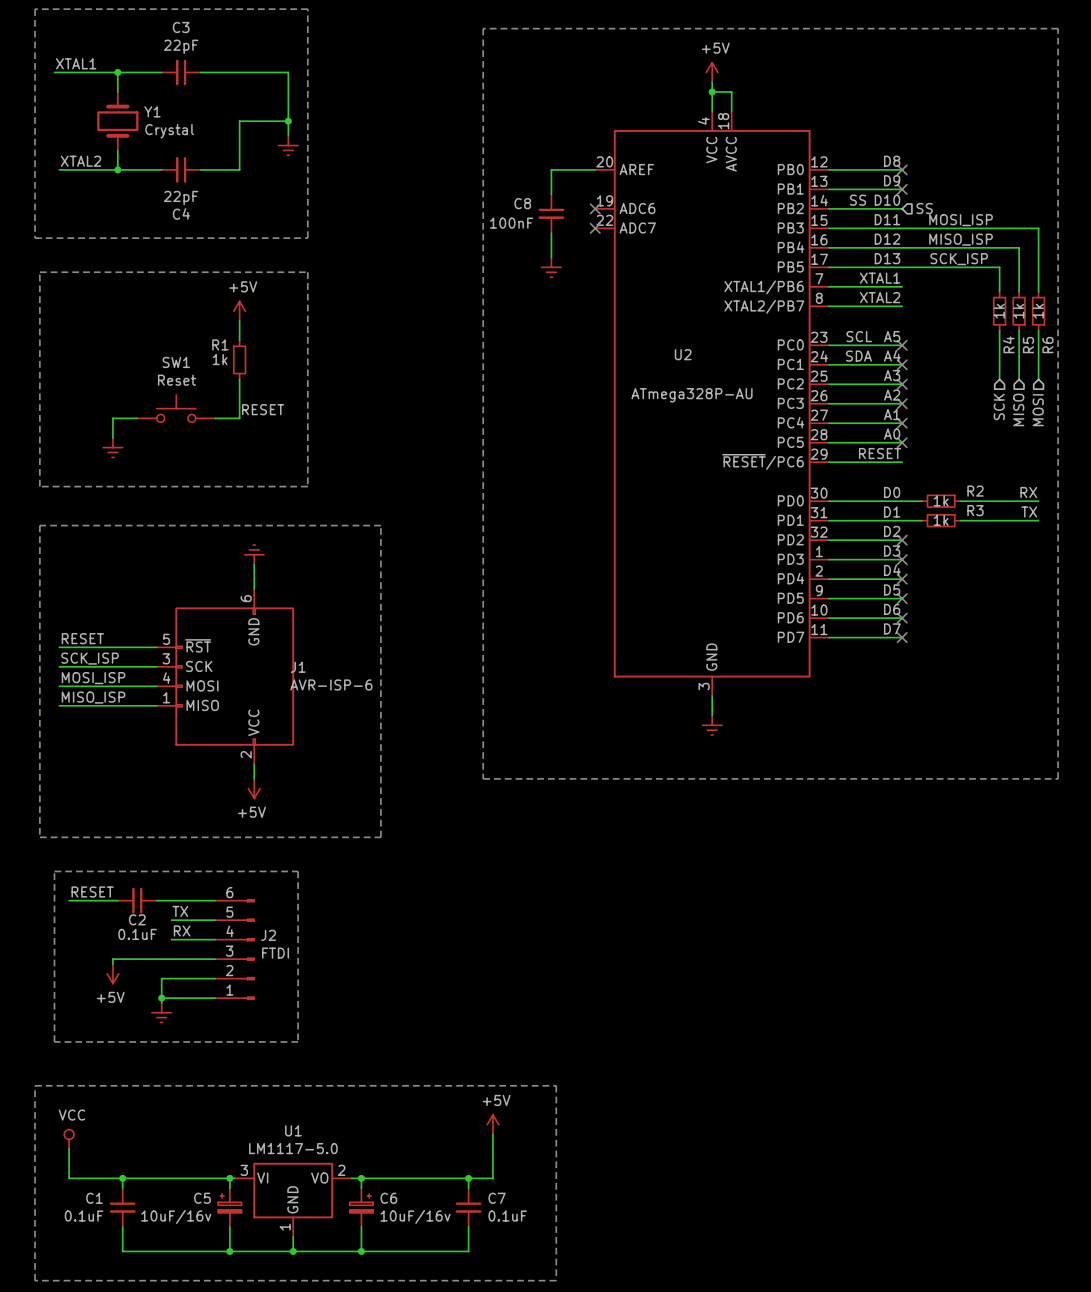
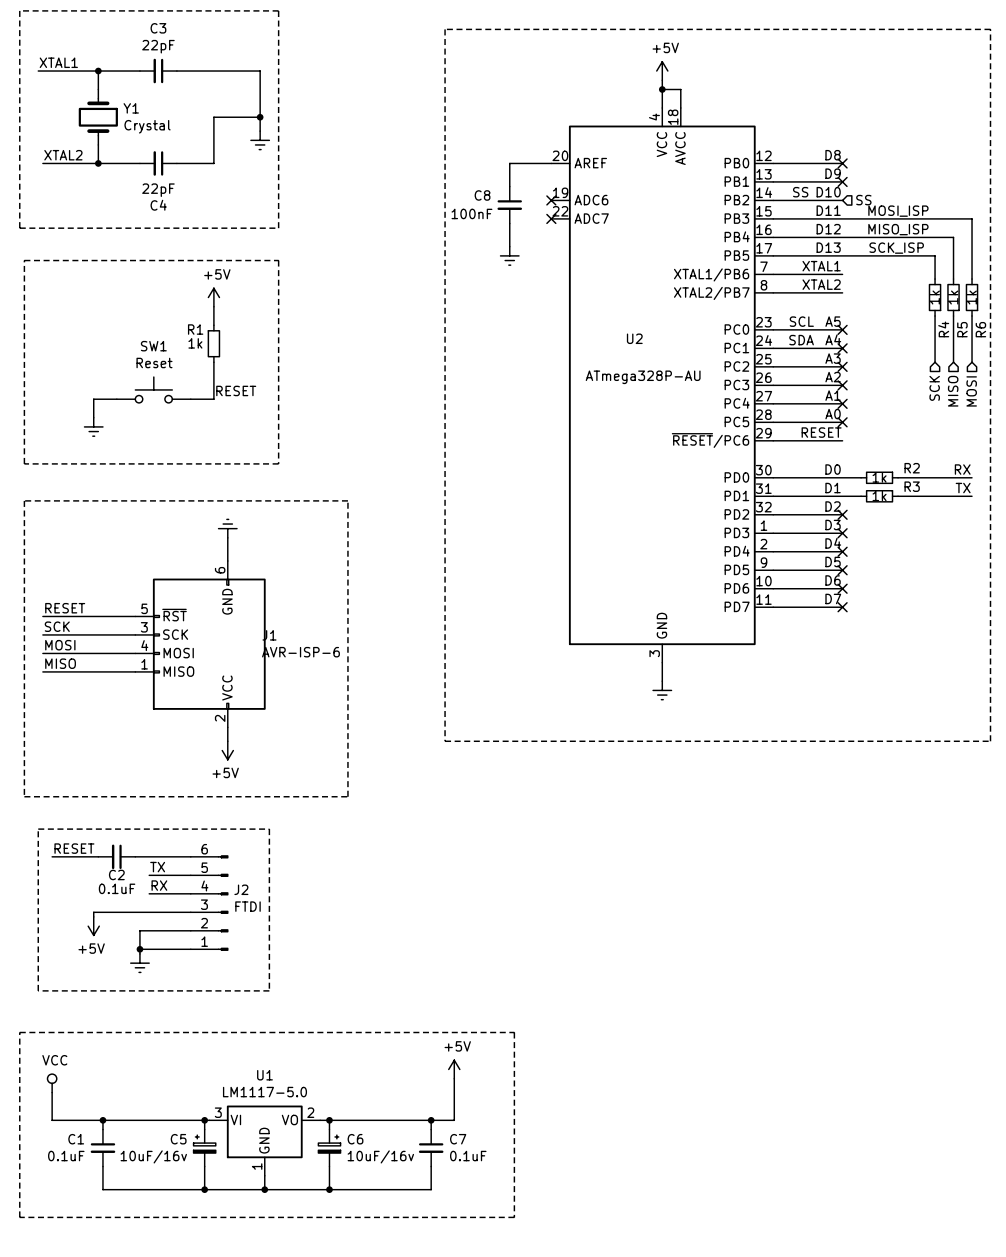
label: SCK_ISP (90, 658) -> SCK (57, 626)
label: MOSI_ISP (93, 678) -> MOSI (60, 645)
label: MISO_ISP (93, 697) -> MISO (60, 663)

